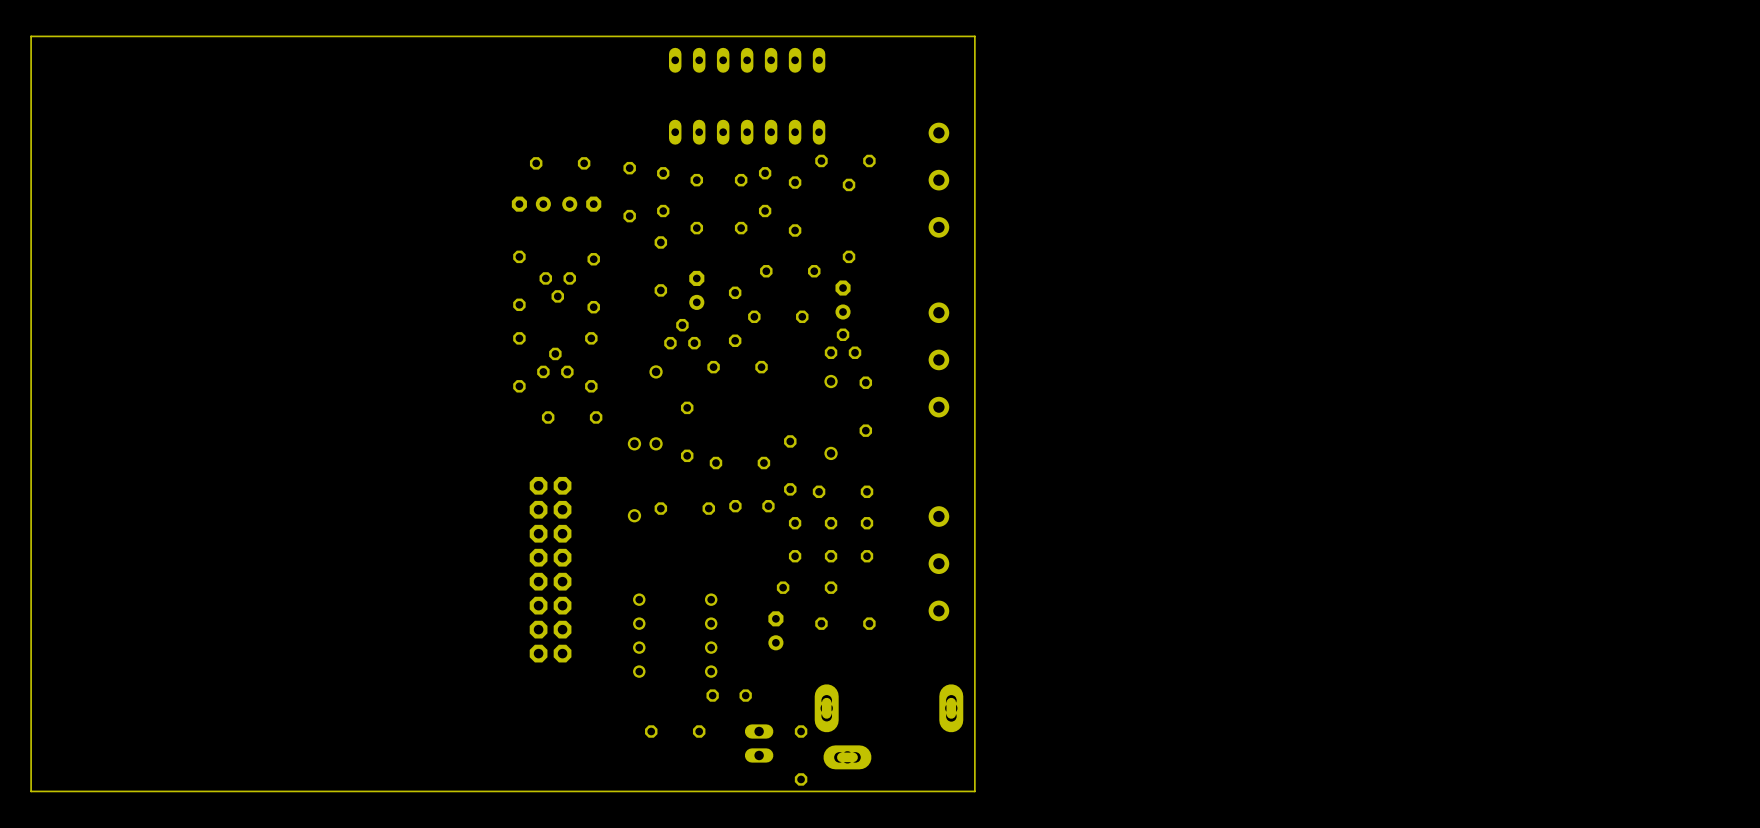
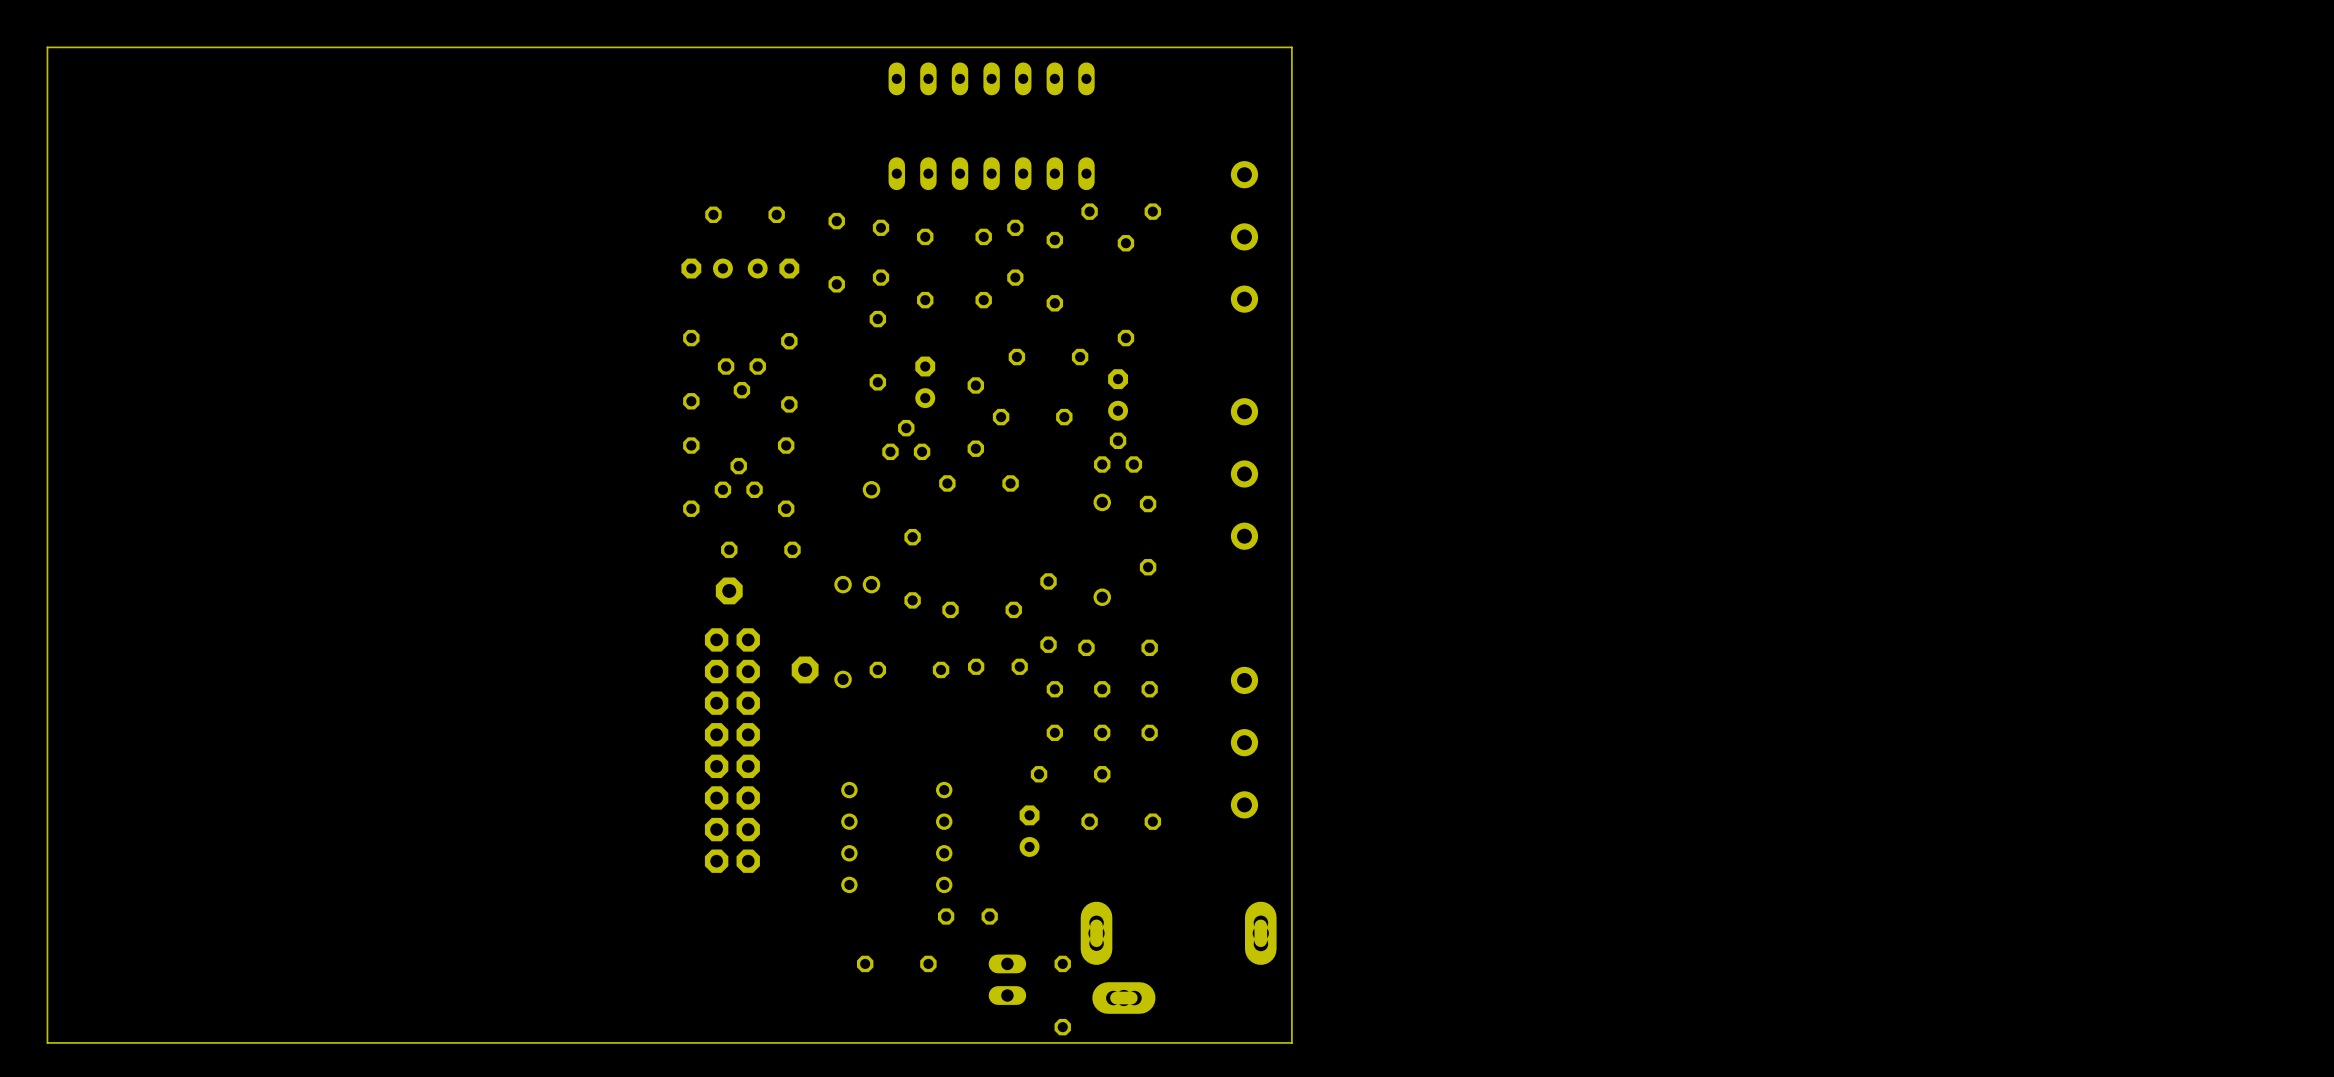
part: none -> (729, 590)
part: none -> (805, 669)

